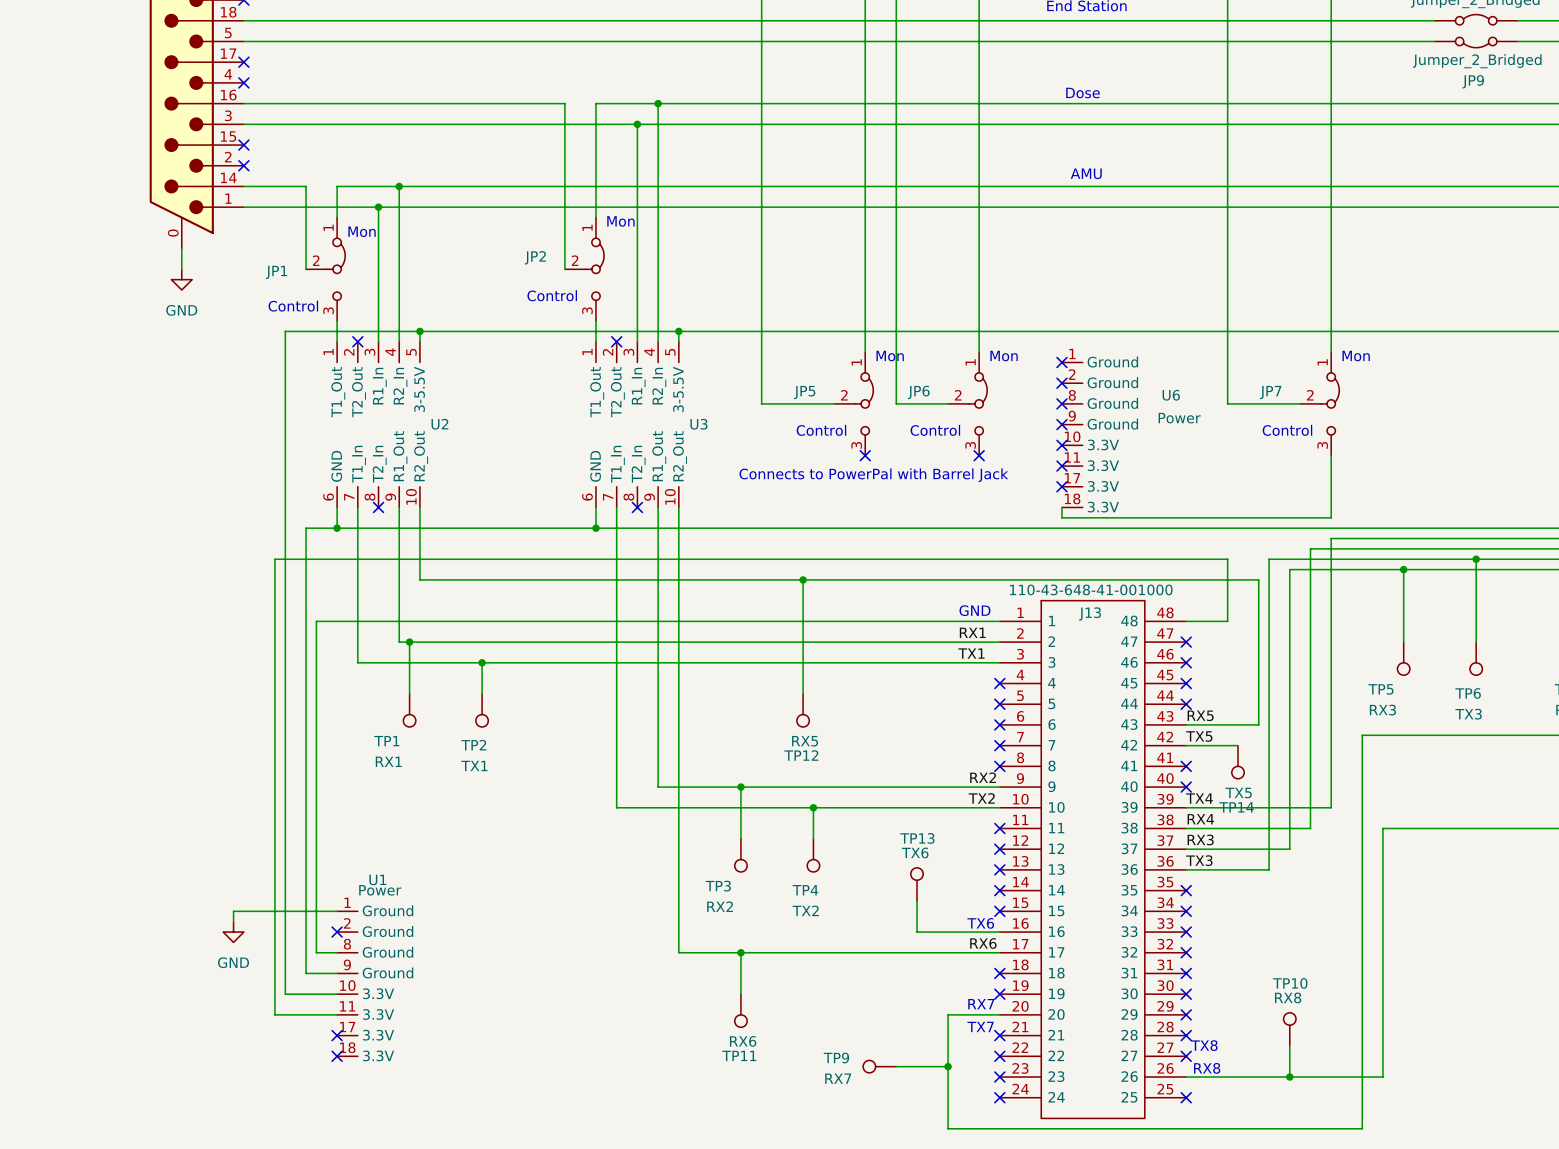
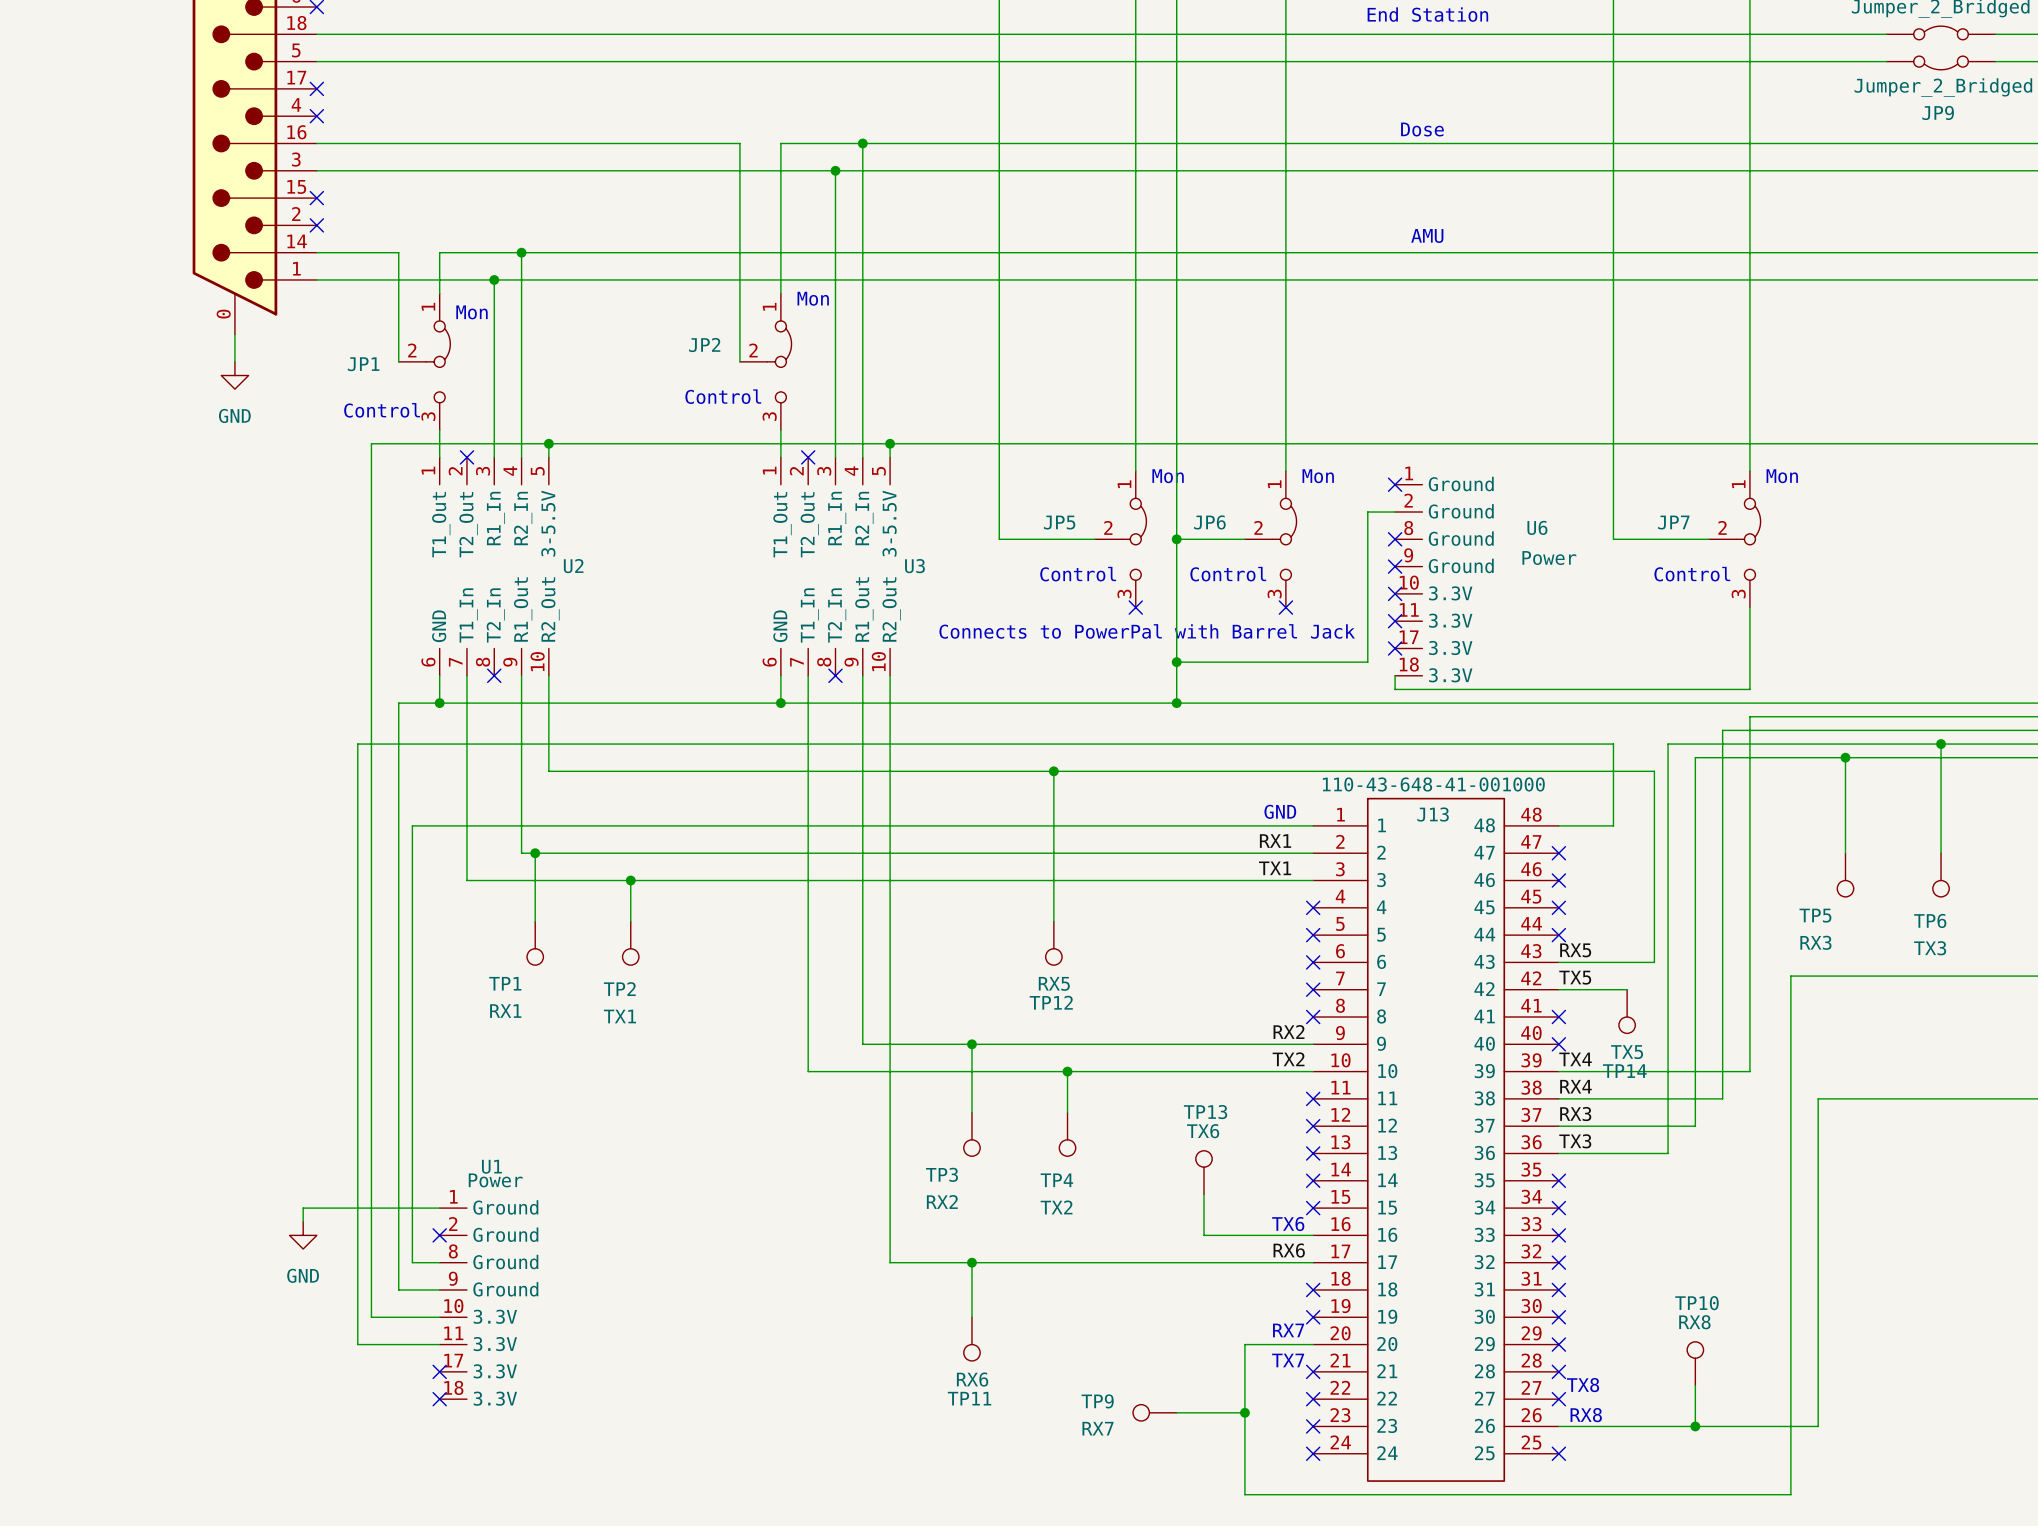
wire: none -> (1395, 512) (1367, 512) (1367, 662) (1176, 662)
no-connect mark: (1061, 383) -> none
wire: none -> (1176, 539) (1176, 703)
junction: none -> (1176, 539)
junction: none -> (1176, 662)
junction: none -> (1176, 703)

